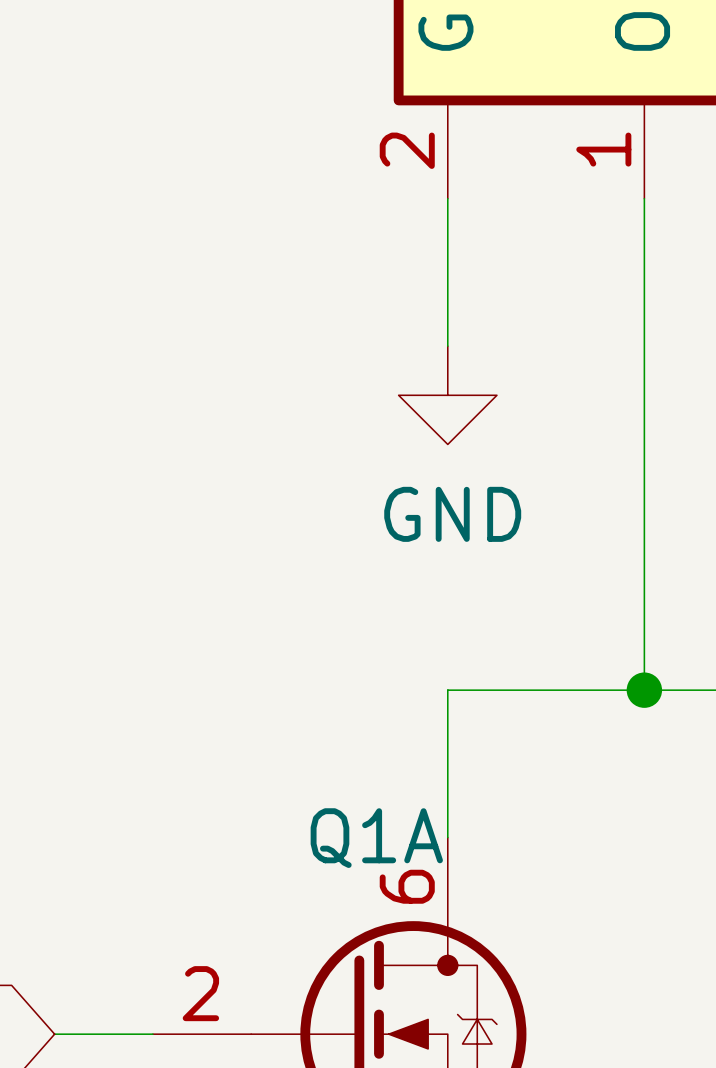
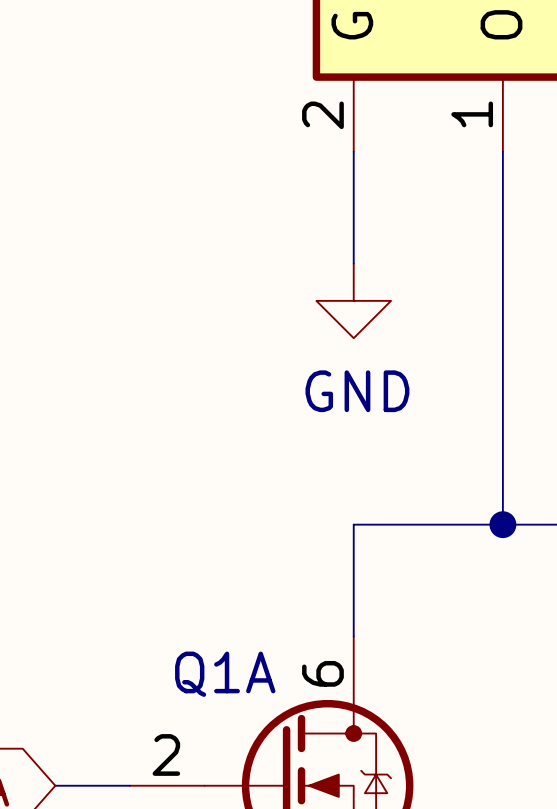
Q1A name position: Q1A (376, 838) -> Q1A (225, 674)

